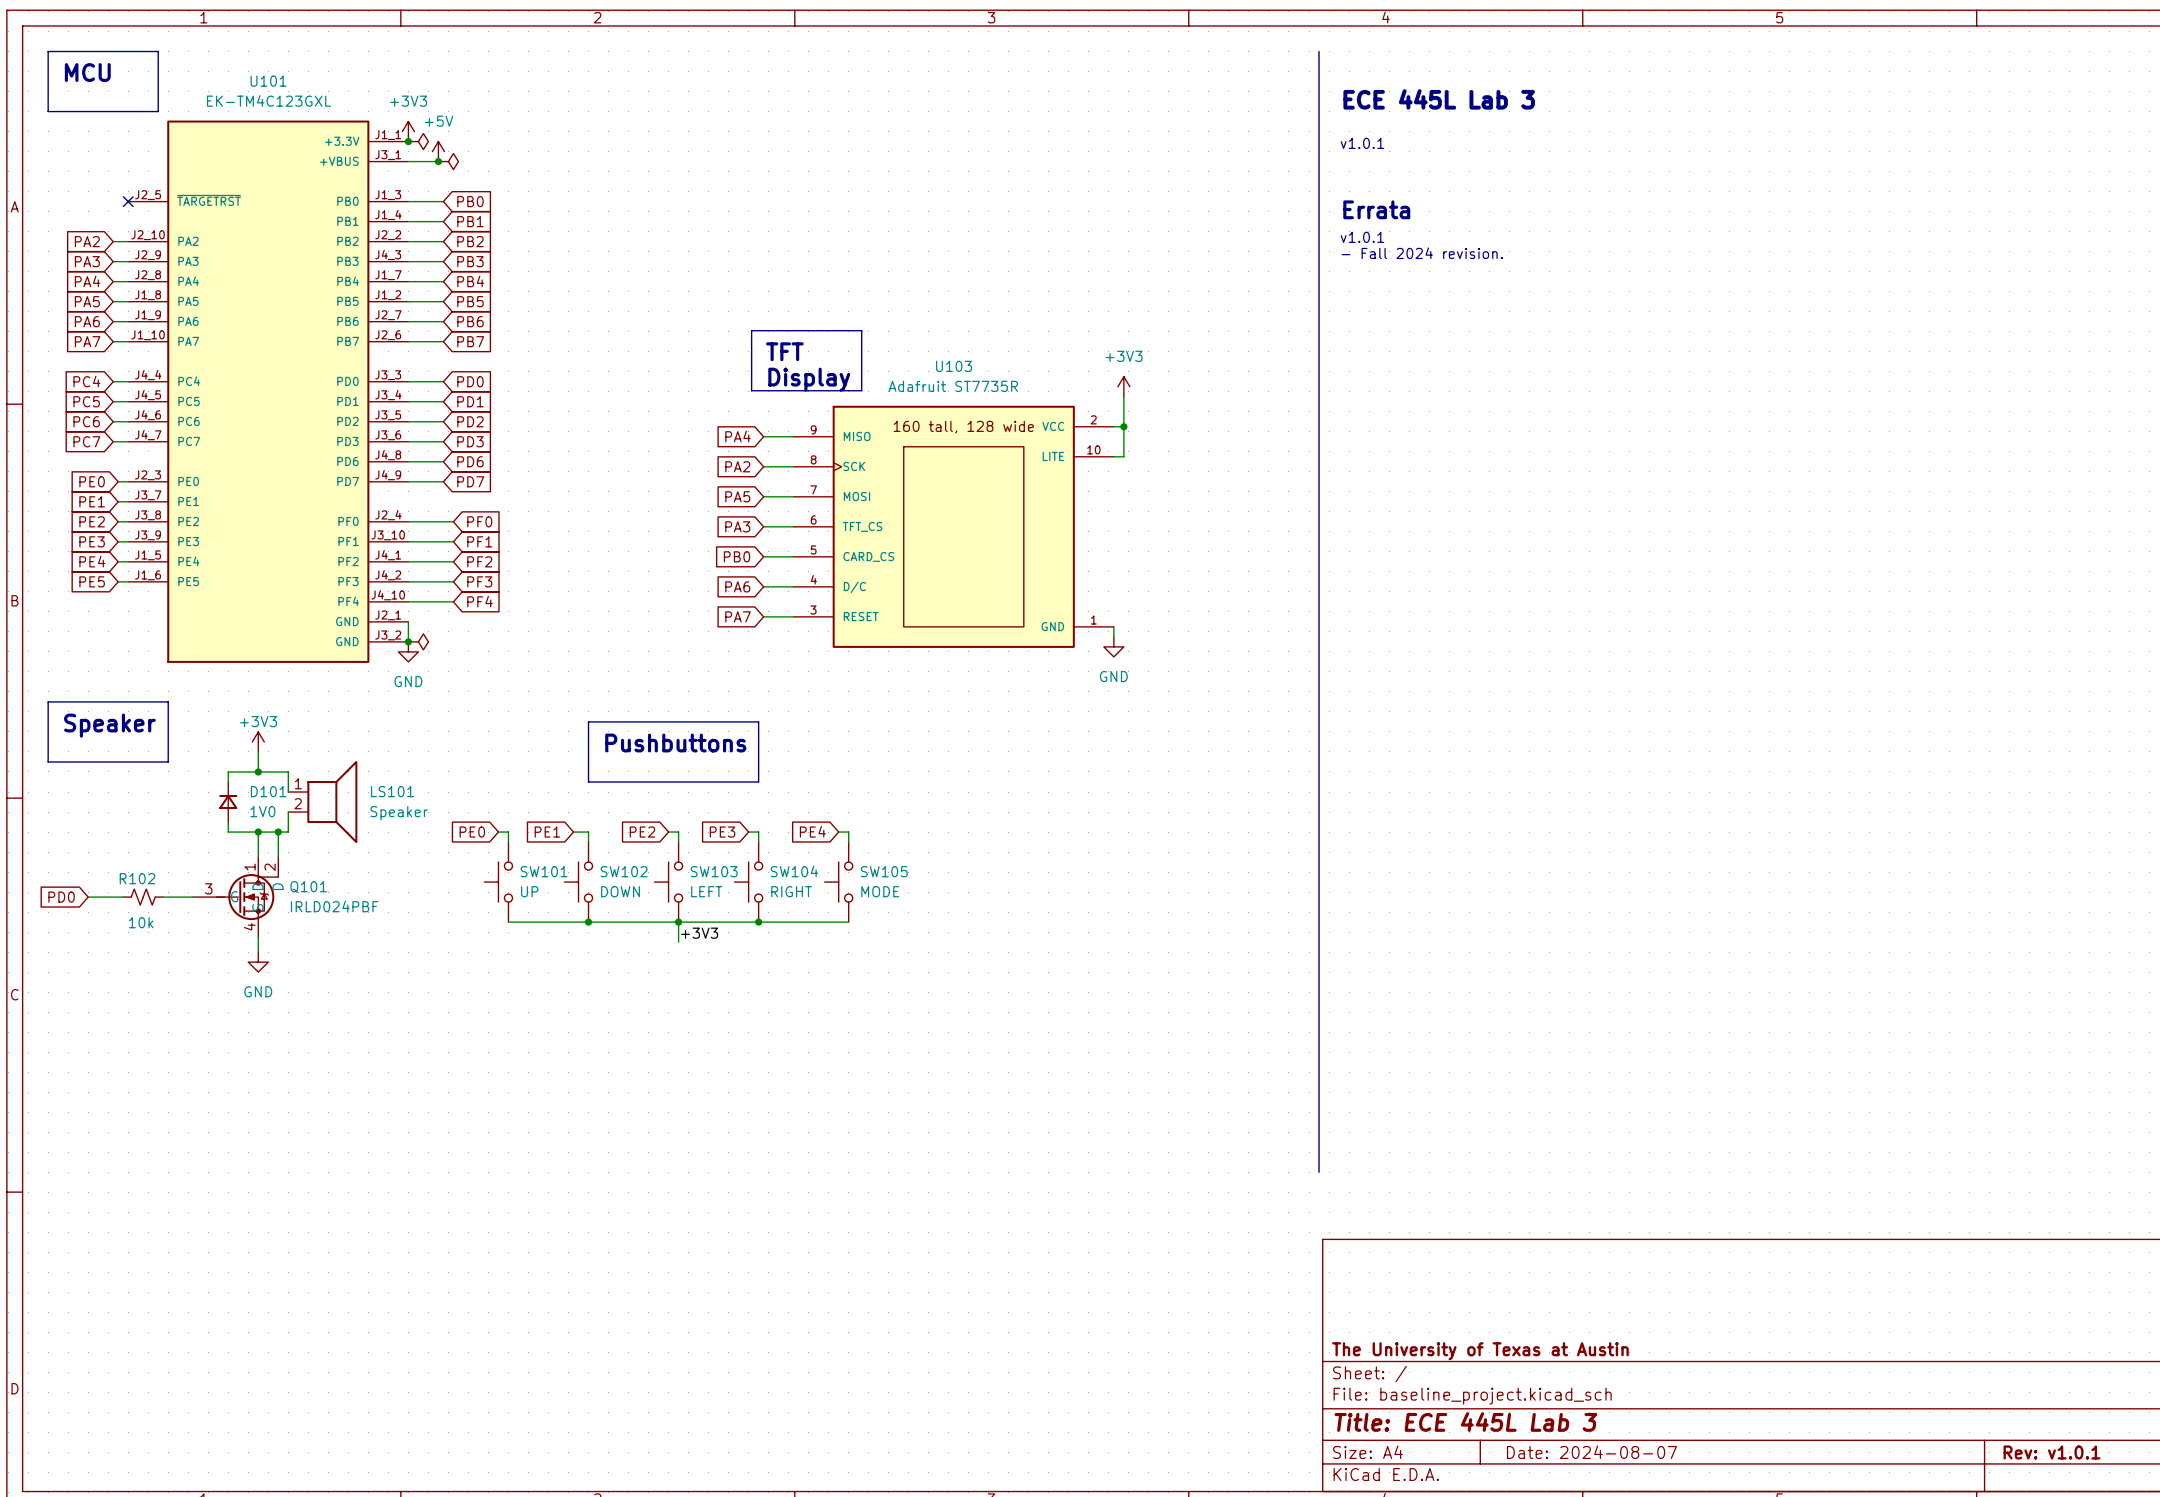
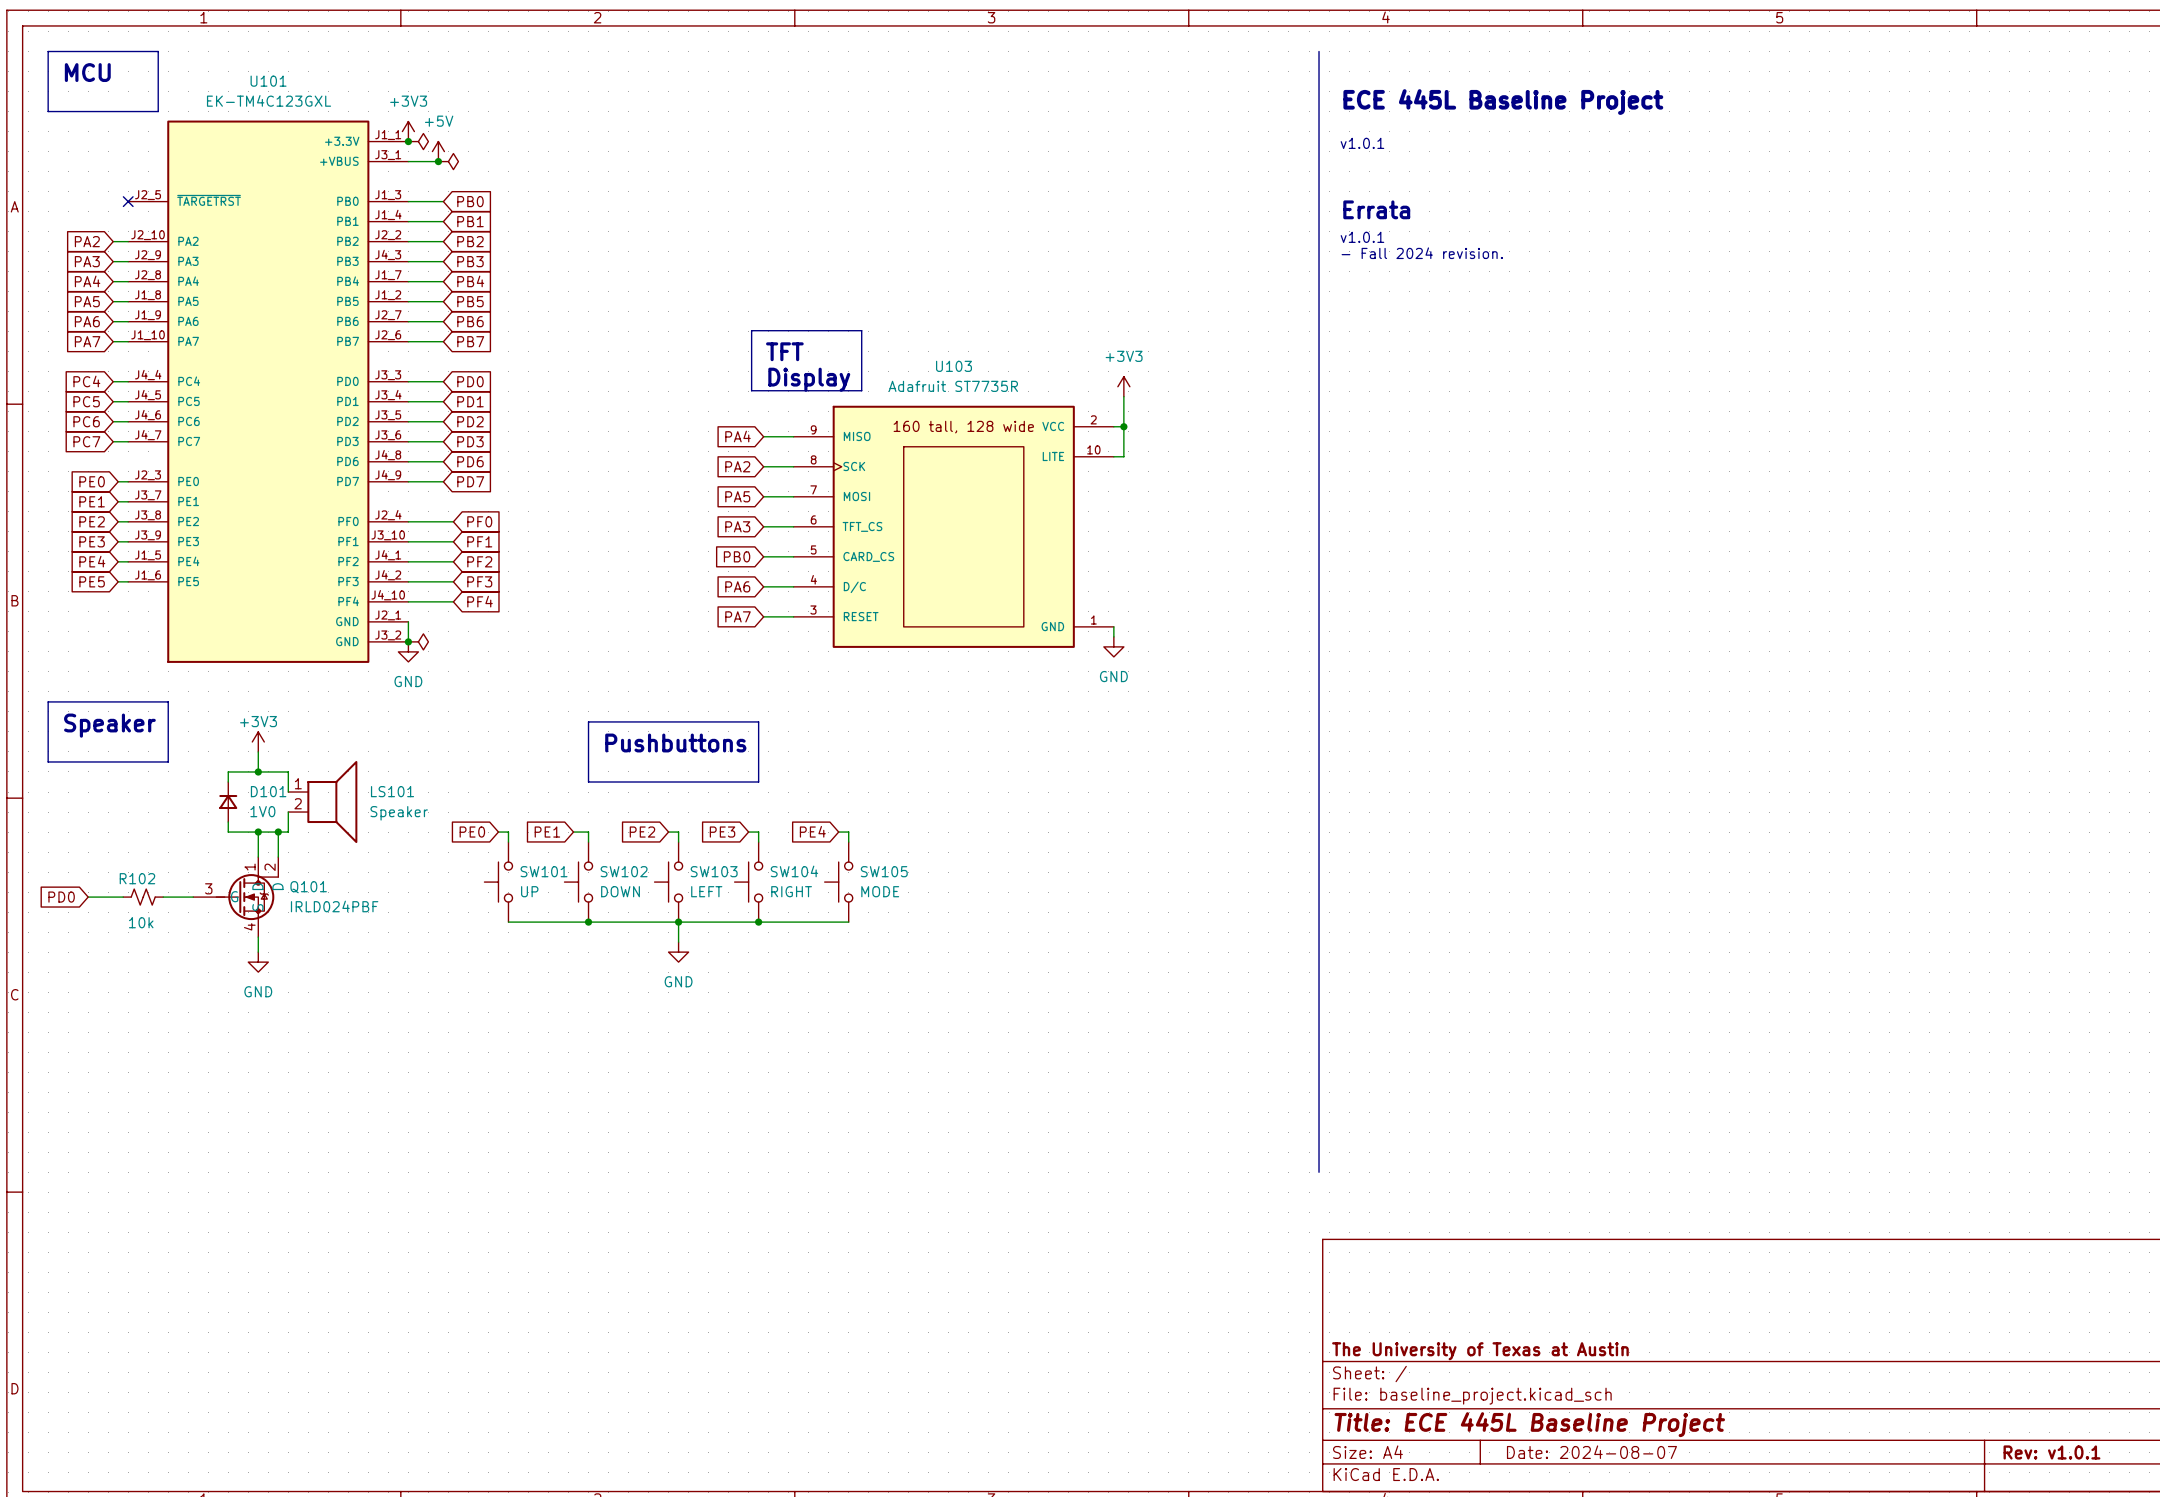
text: ECE 445L Lab 3 (1439, 99) -> ECE 445L Baseline Project (1503, 102)
label: +3V3 (699, 933) -> none
power symbol: none -> GND (678, 952)
title block: Title: ECE 445L Lab 3 (1465, 1422) -> Title: ECE 445L Baseline Project (1529, 1424)

